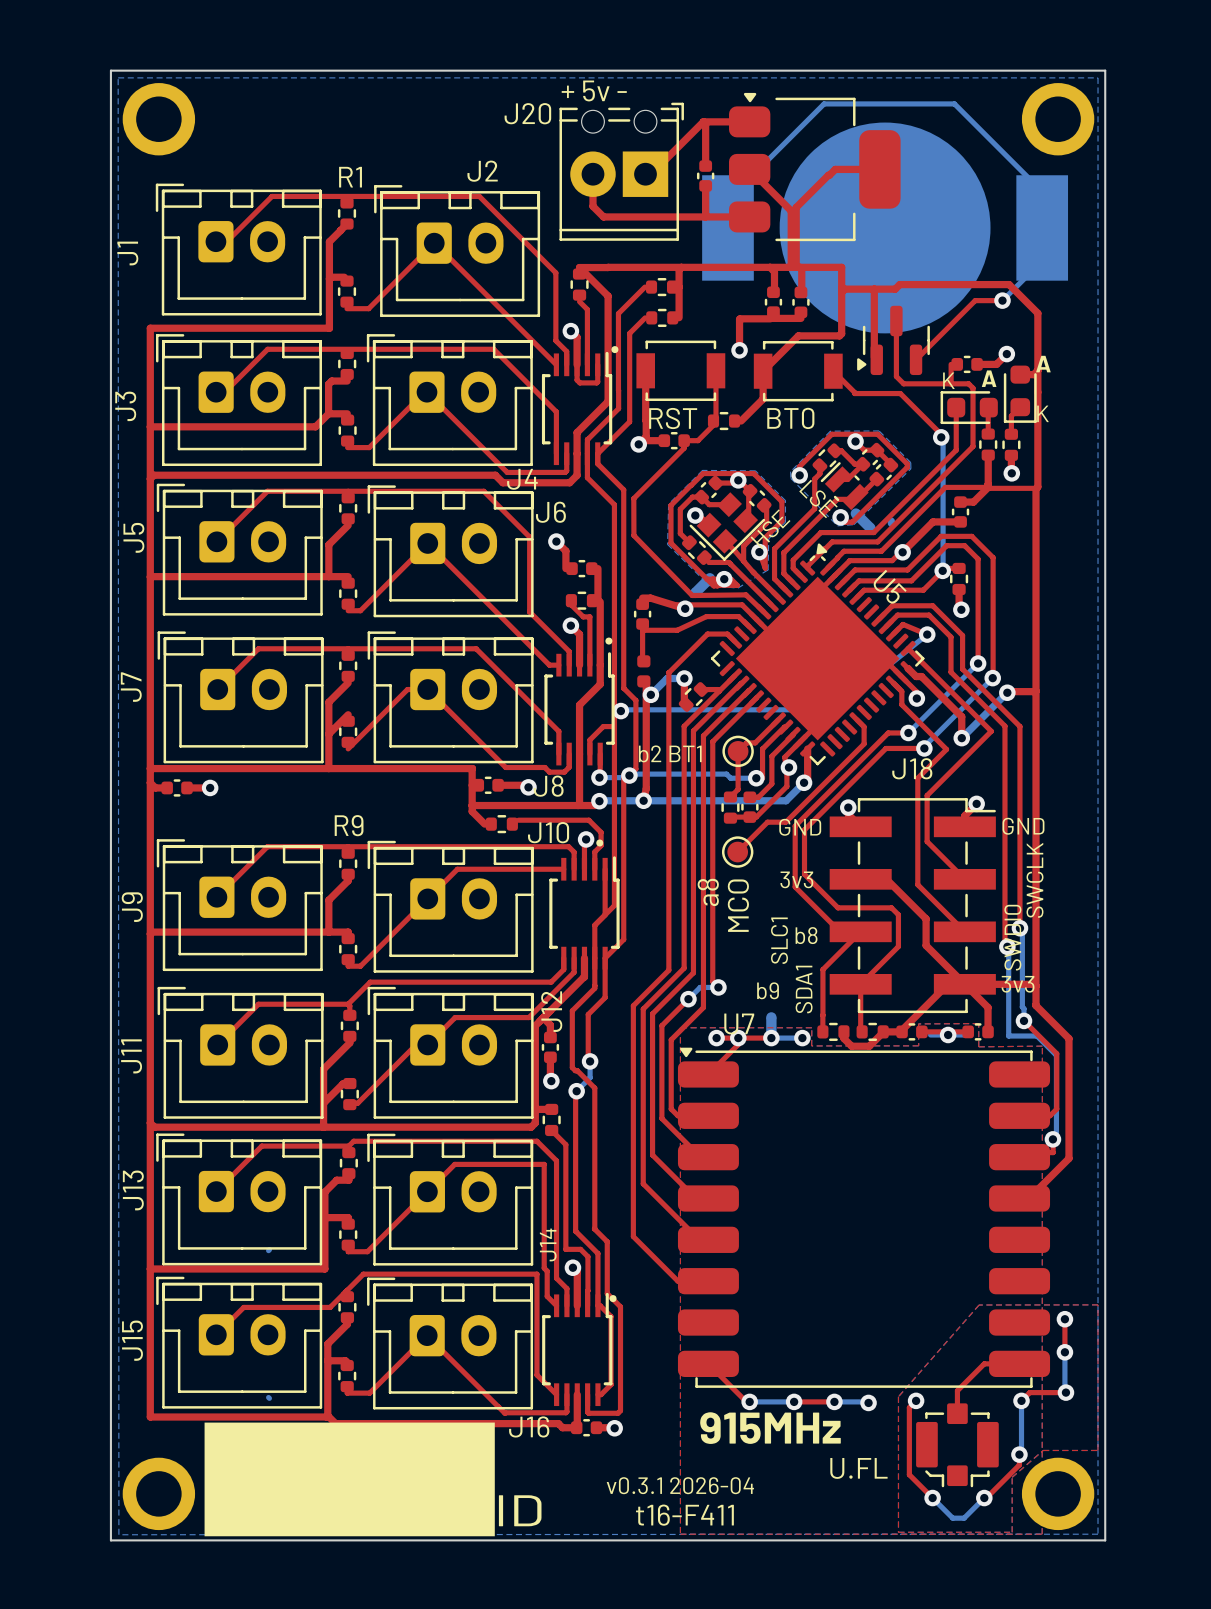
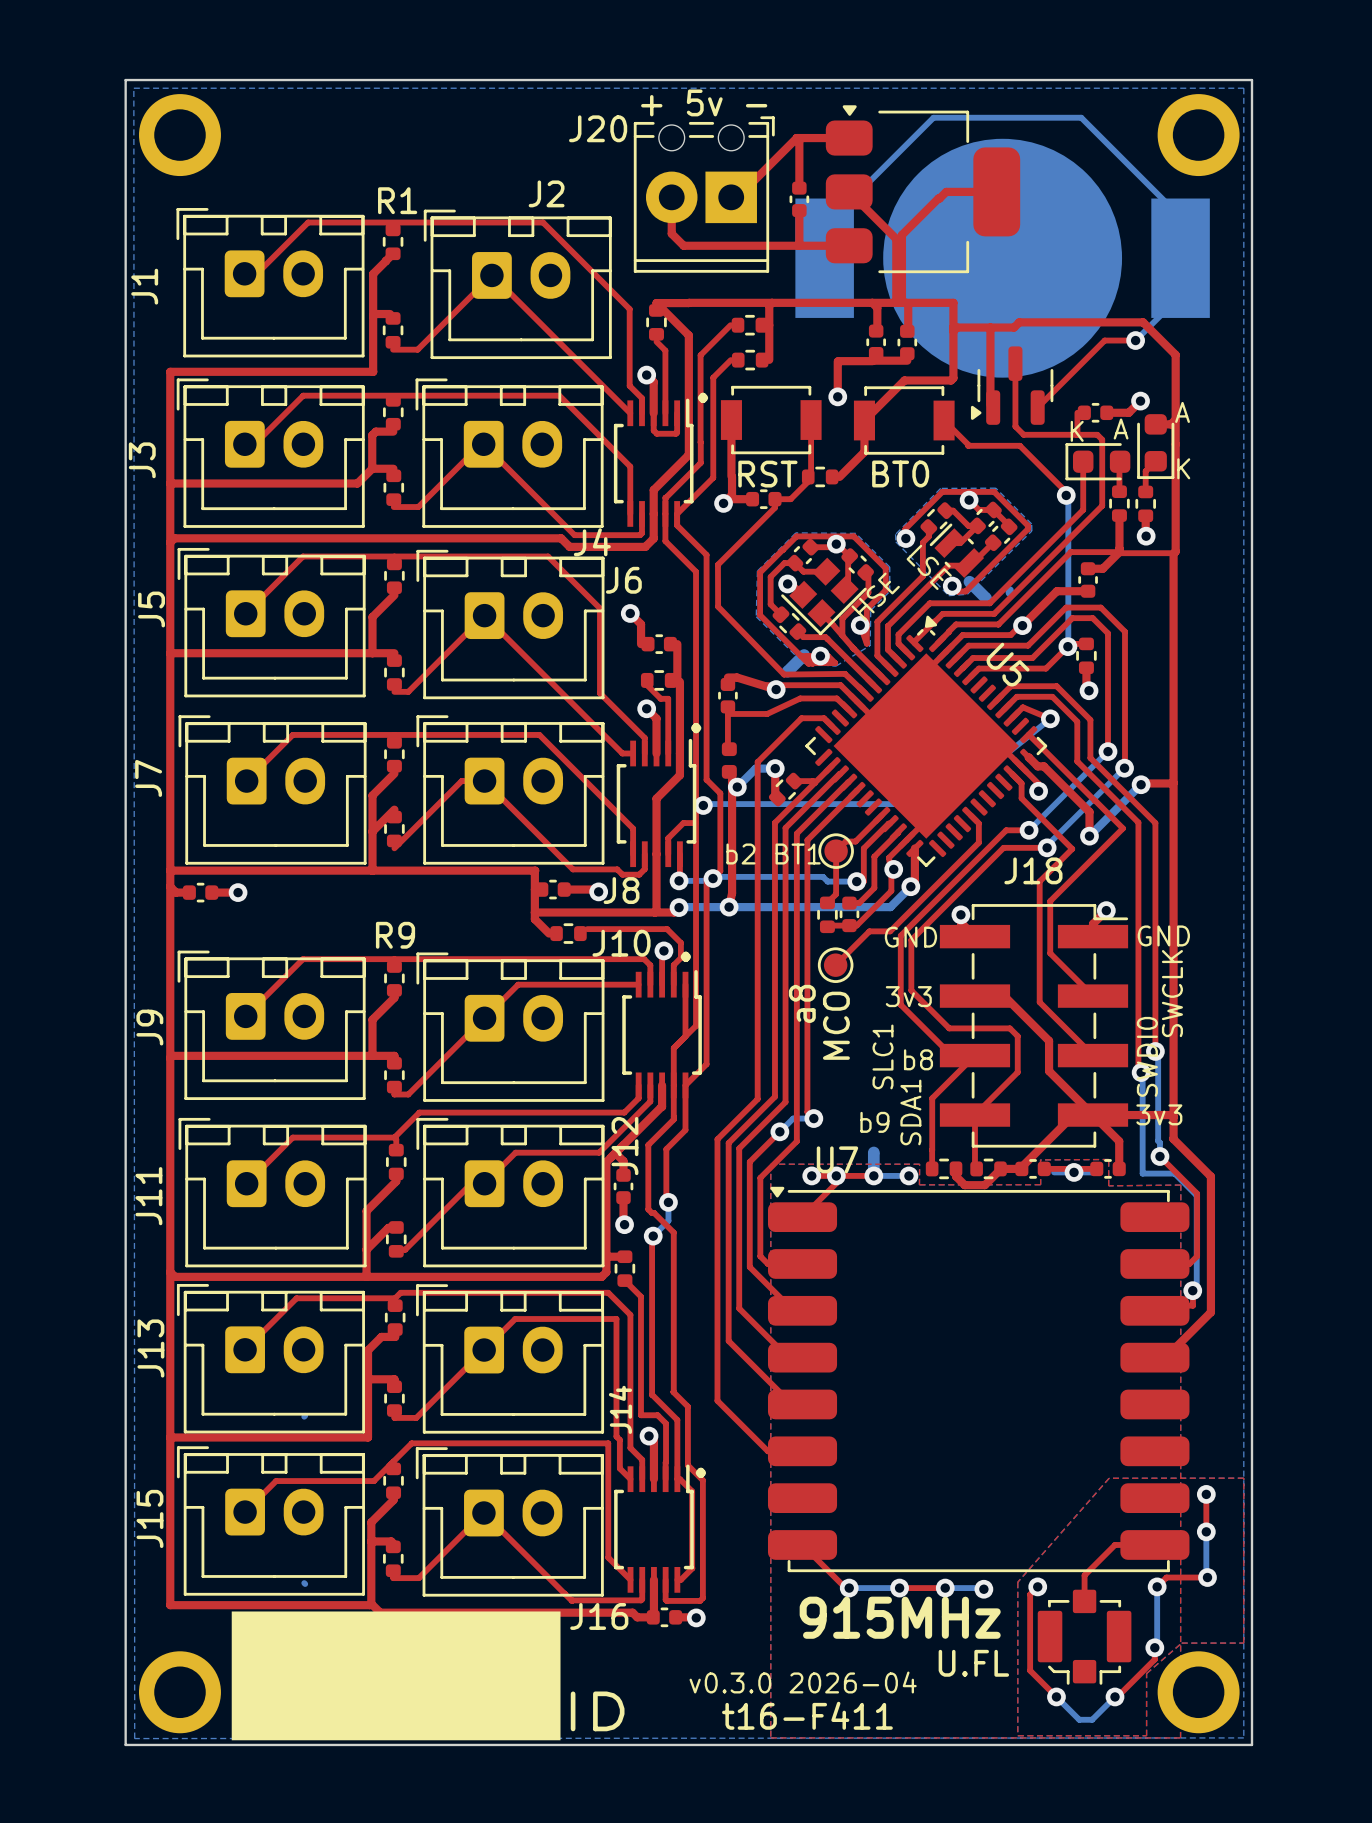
text: v0.3.1 2026-04 (680, 1485) -> v0.3.0 2026-04 (803, 1682)

